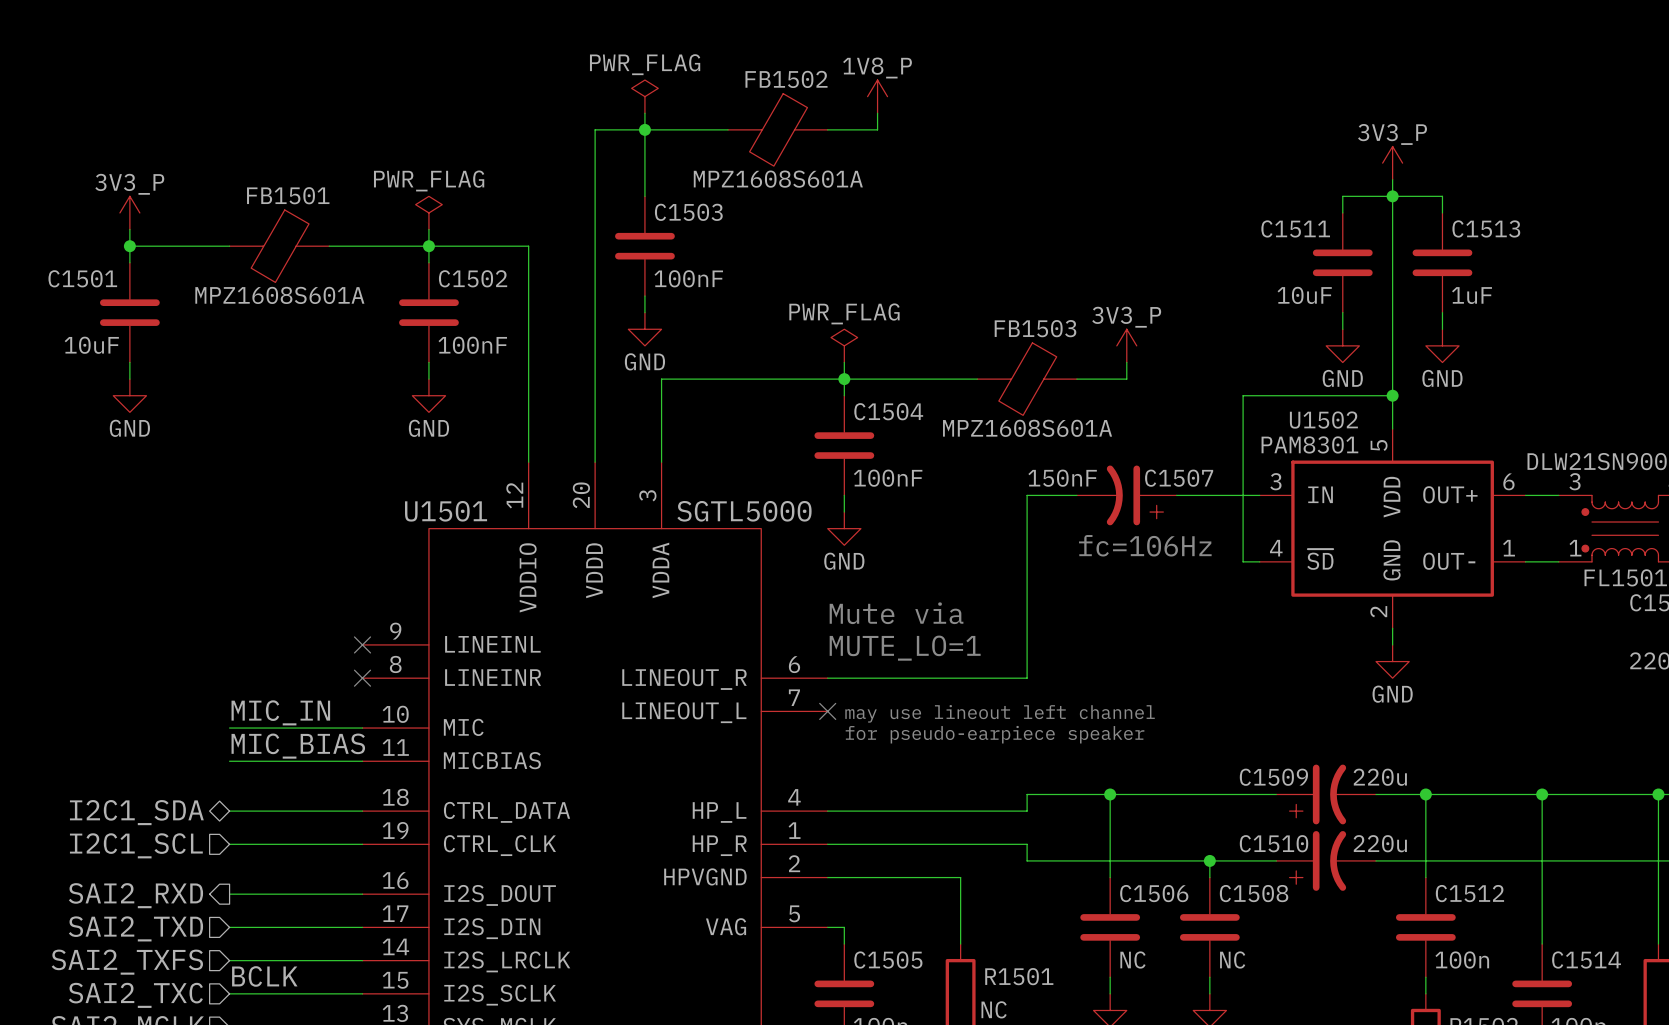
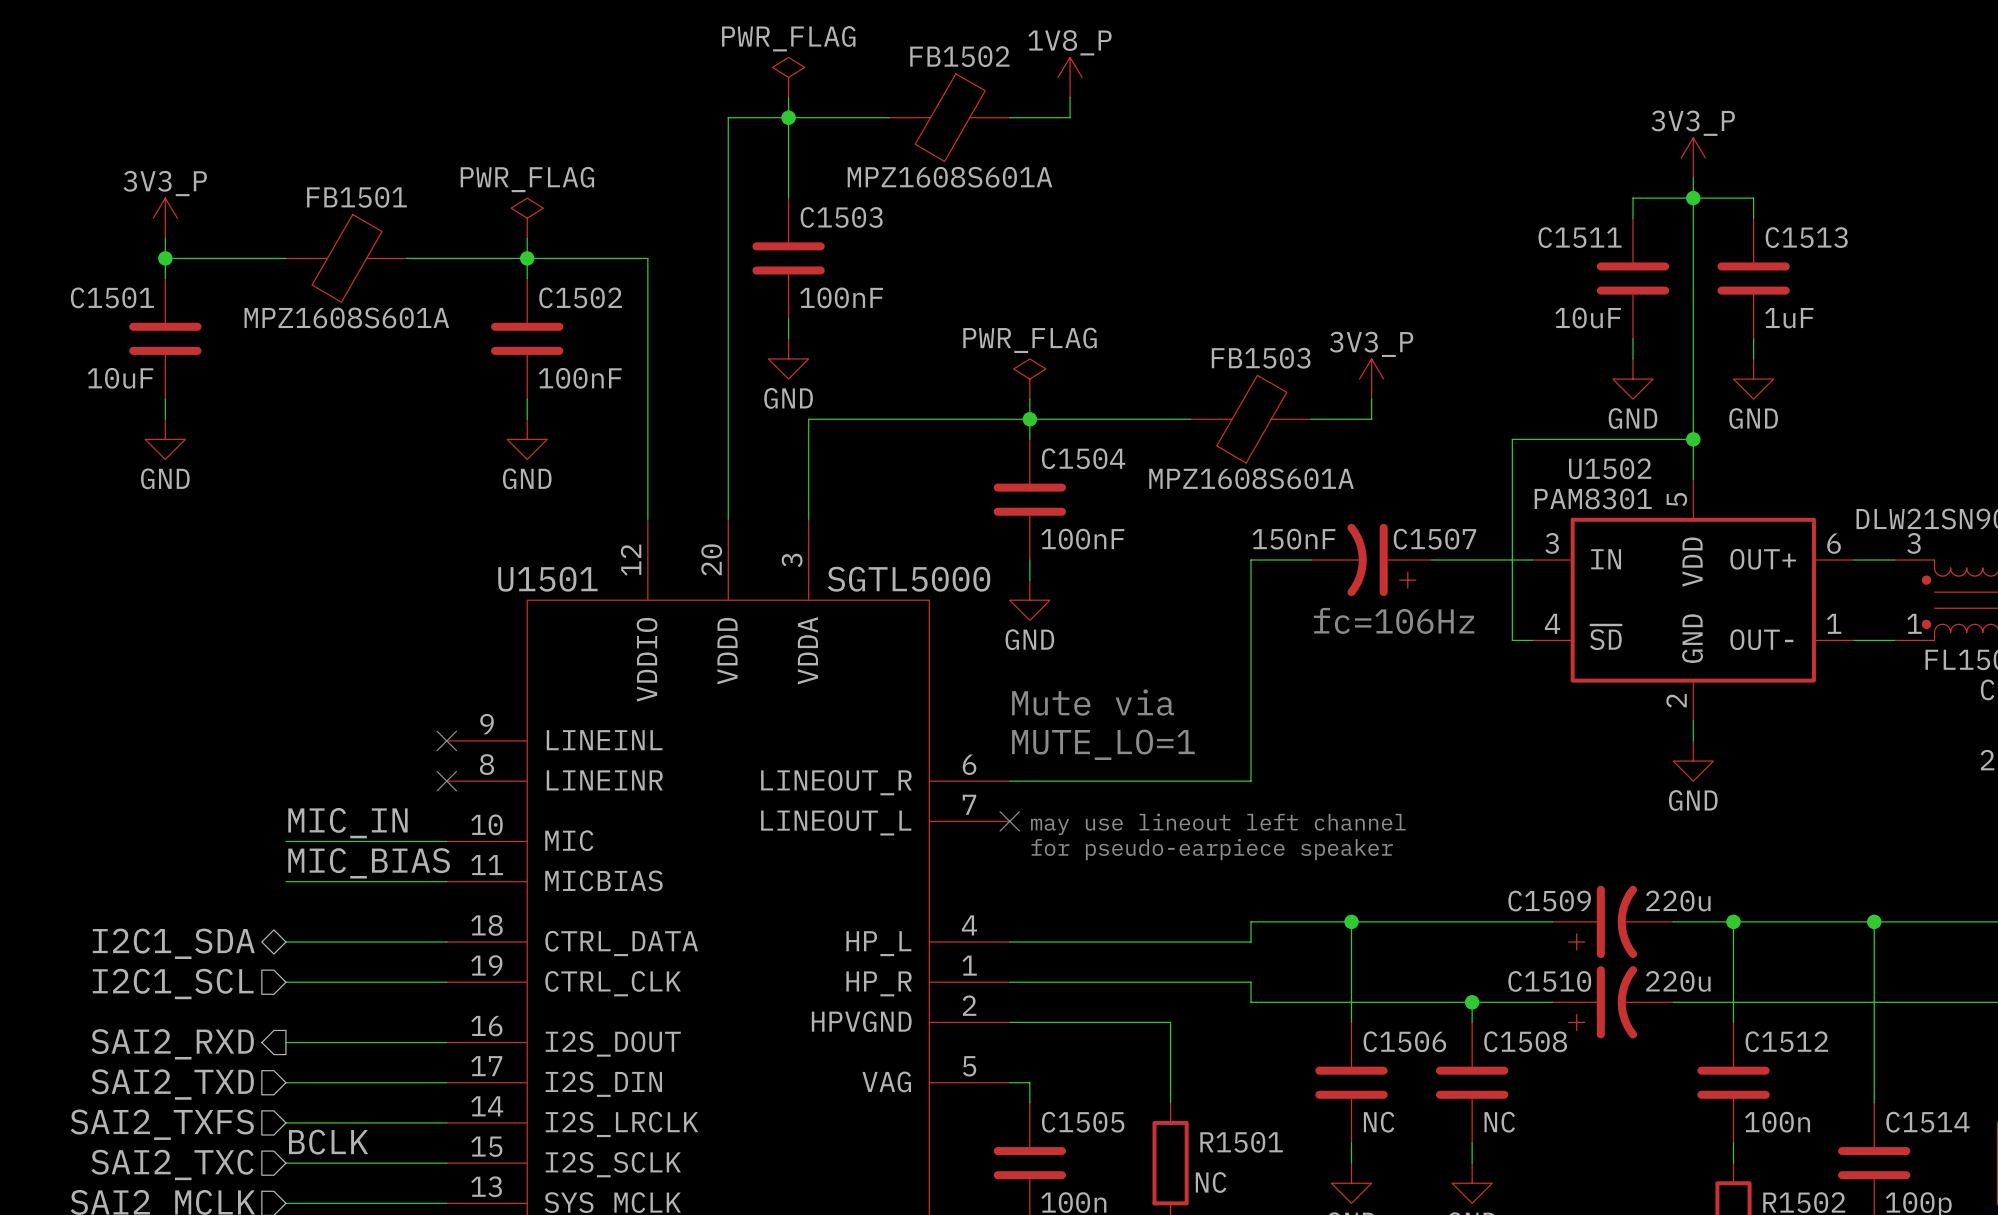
C1511 name position: C1511 (1295, 228) -> C1511 (1580, 237)
C1501 name position: C1501 (82, 278) -> C1501 (112, 297)
C1511 value position: 10uF (1304, 295) -> 10uF (1588, 317)
C1501 value position: 10uF (91, 345) -> 10uF (120, 378)

